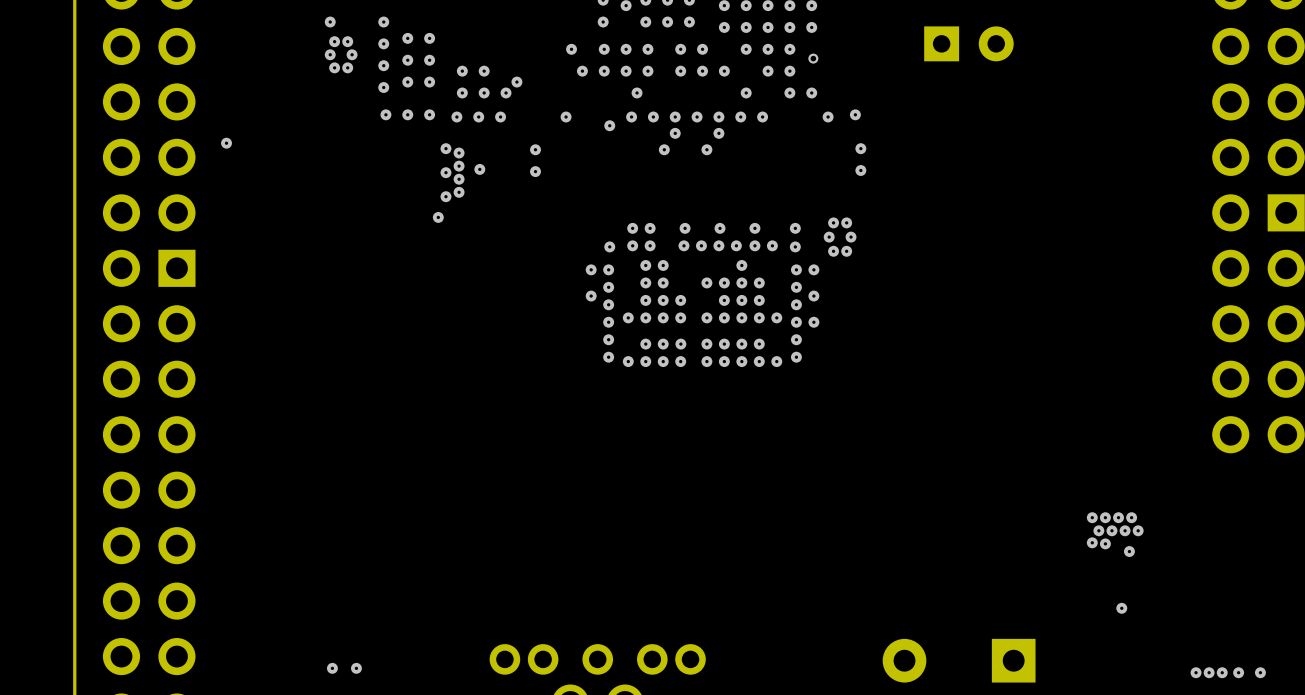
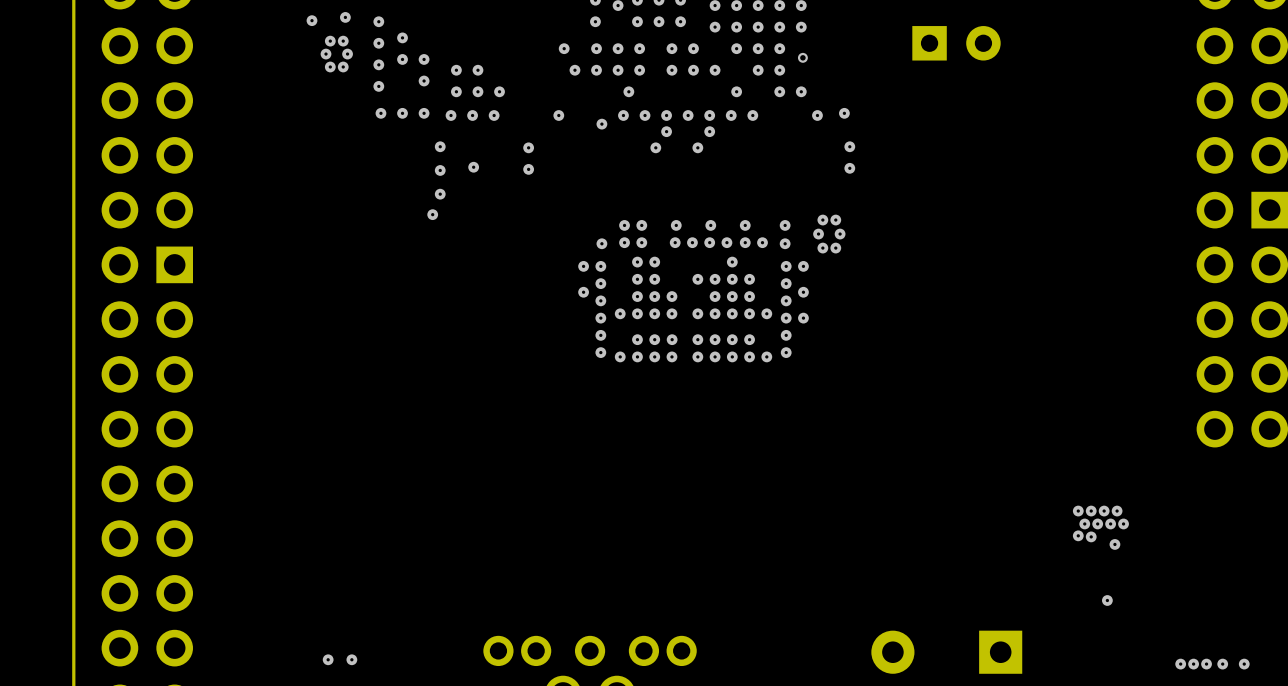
via: none -> (345, 17)
via: none -> (311, 20)
via: (330, 22) -> none
via: (429, 38) -> none
via: (407, 82) -> none
via: (516, 82) -> none
via: (226, 143) -> none
via: (459, 153) -> none
via: (459, 166) -> none
via: (459, 179) -> none
via: (459, 192) -> none

